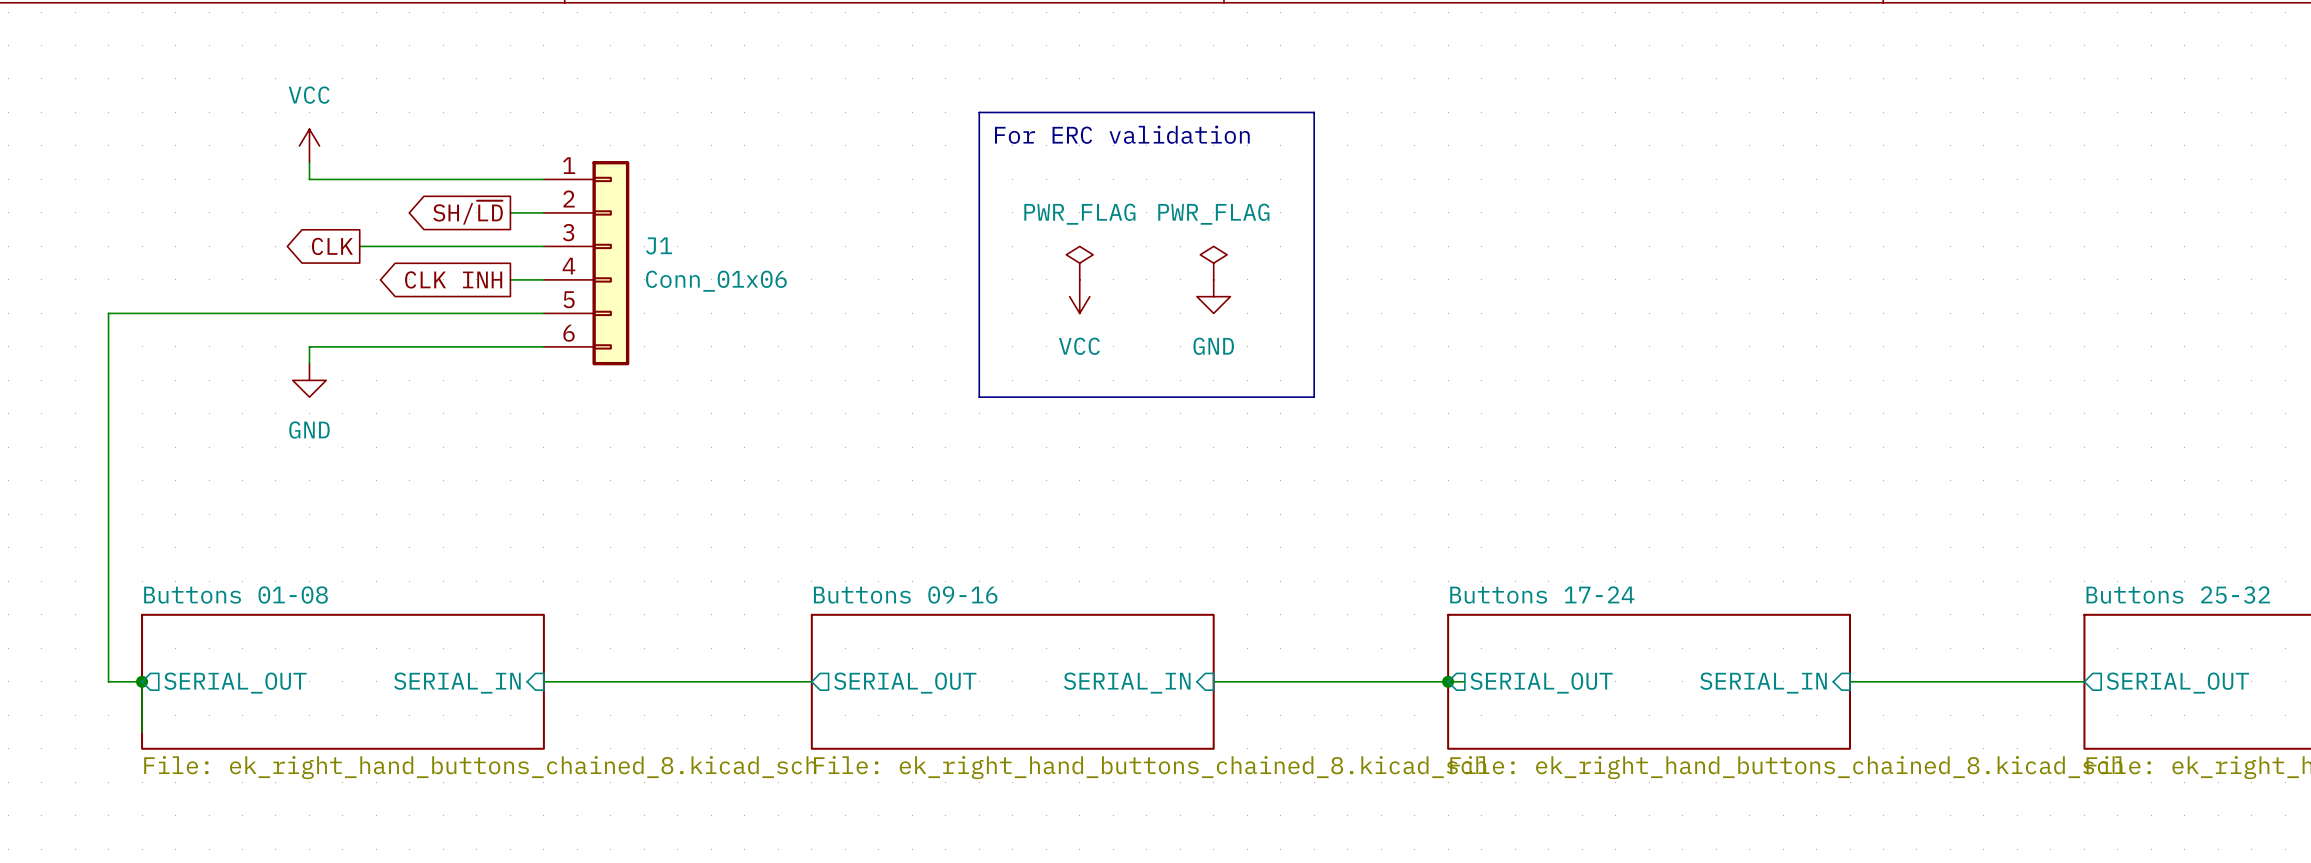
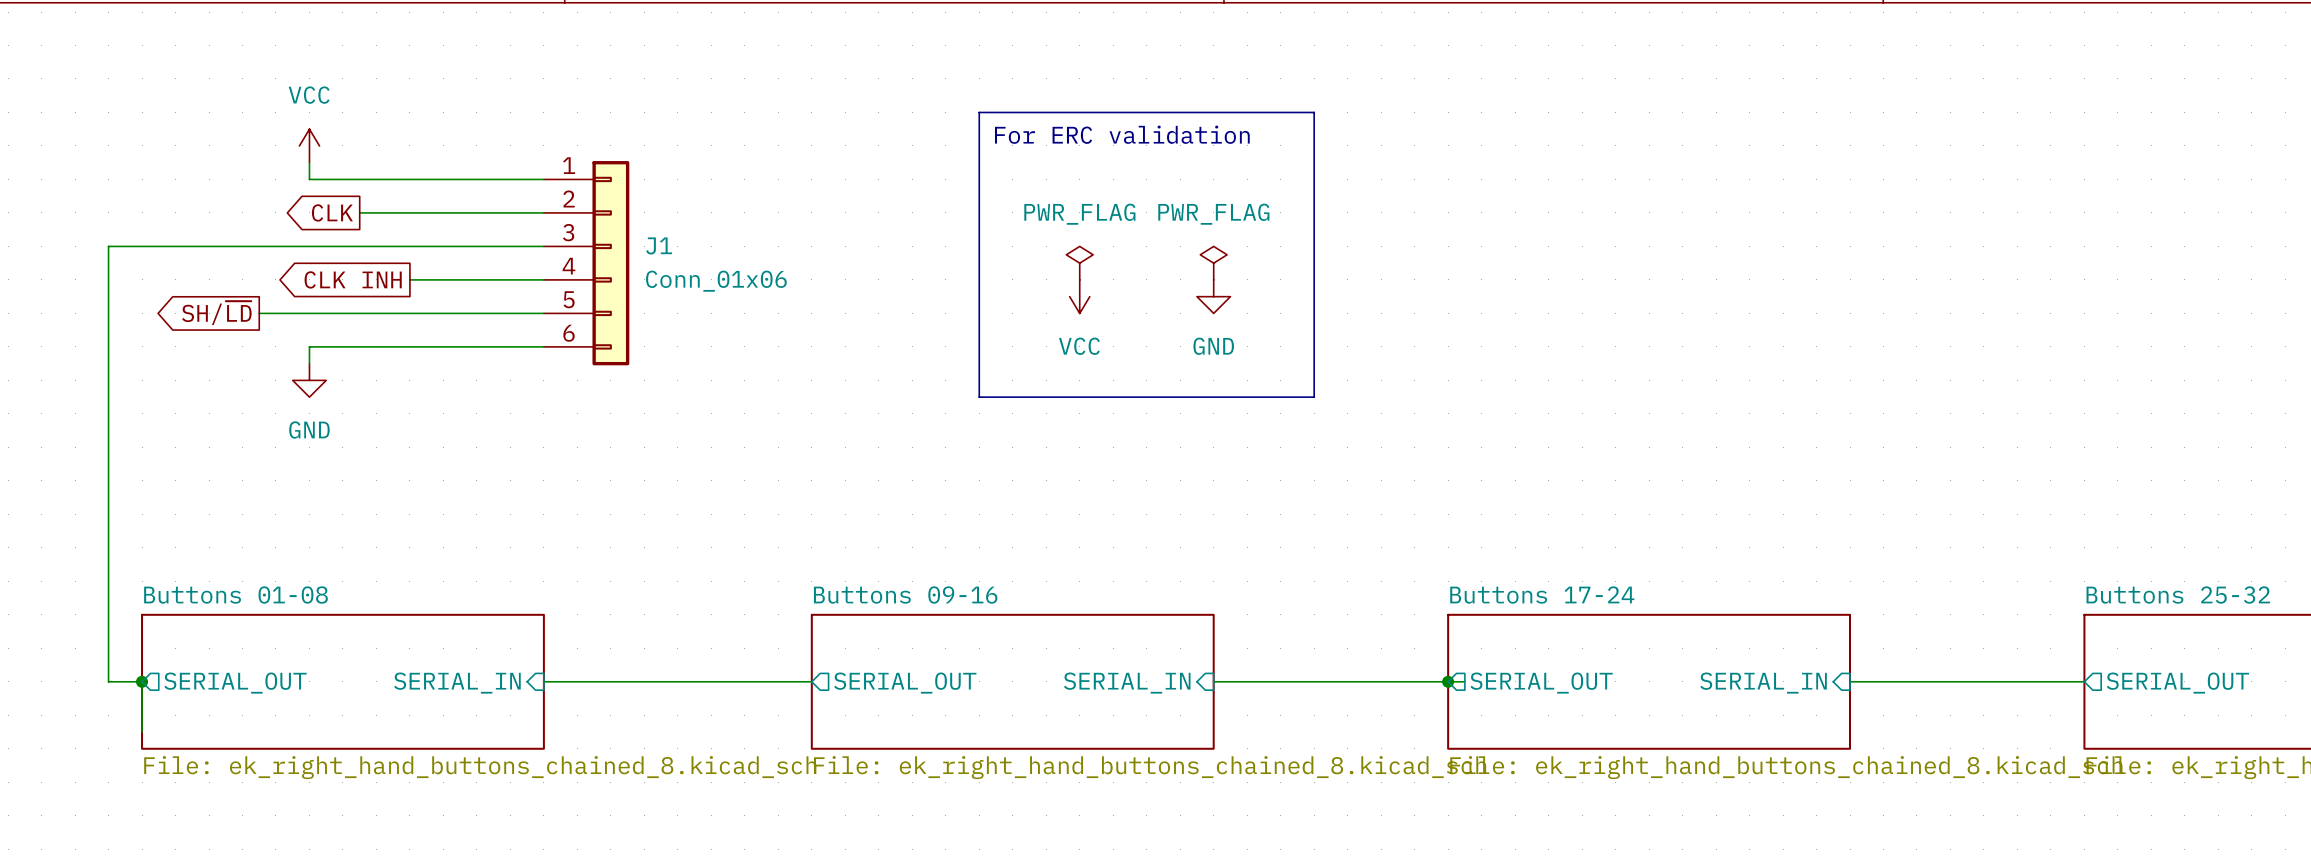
wire: none -> (359, 212) (510, 212)
global label position: SH/~{LD} (468, 212) -> SH/~{LD} (216, 313)
global label position: CLK (332, 246) -> CLK (332, 212)
wire: none -> (409, 279) (510, 279)
global label position: CLK INH (453, 279) -> CLK INH (353, 279)
wire: (108, 313) (259, 313) -> (108, 313) (108, 246) (359, 246)

